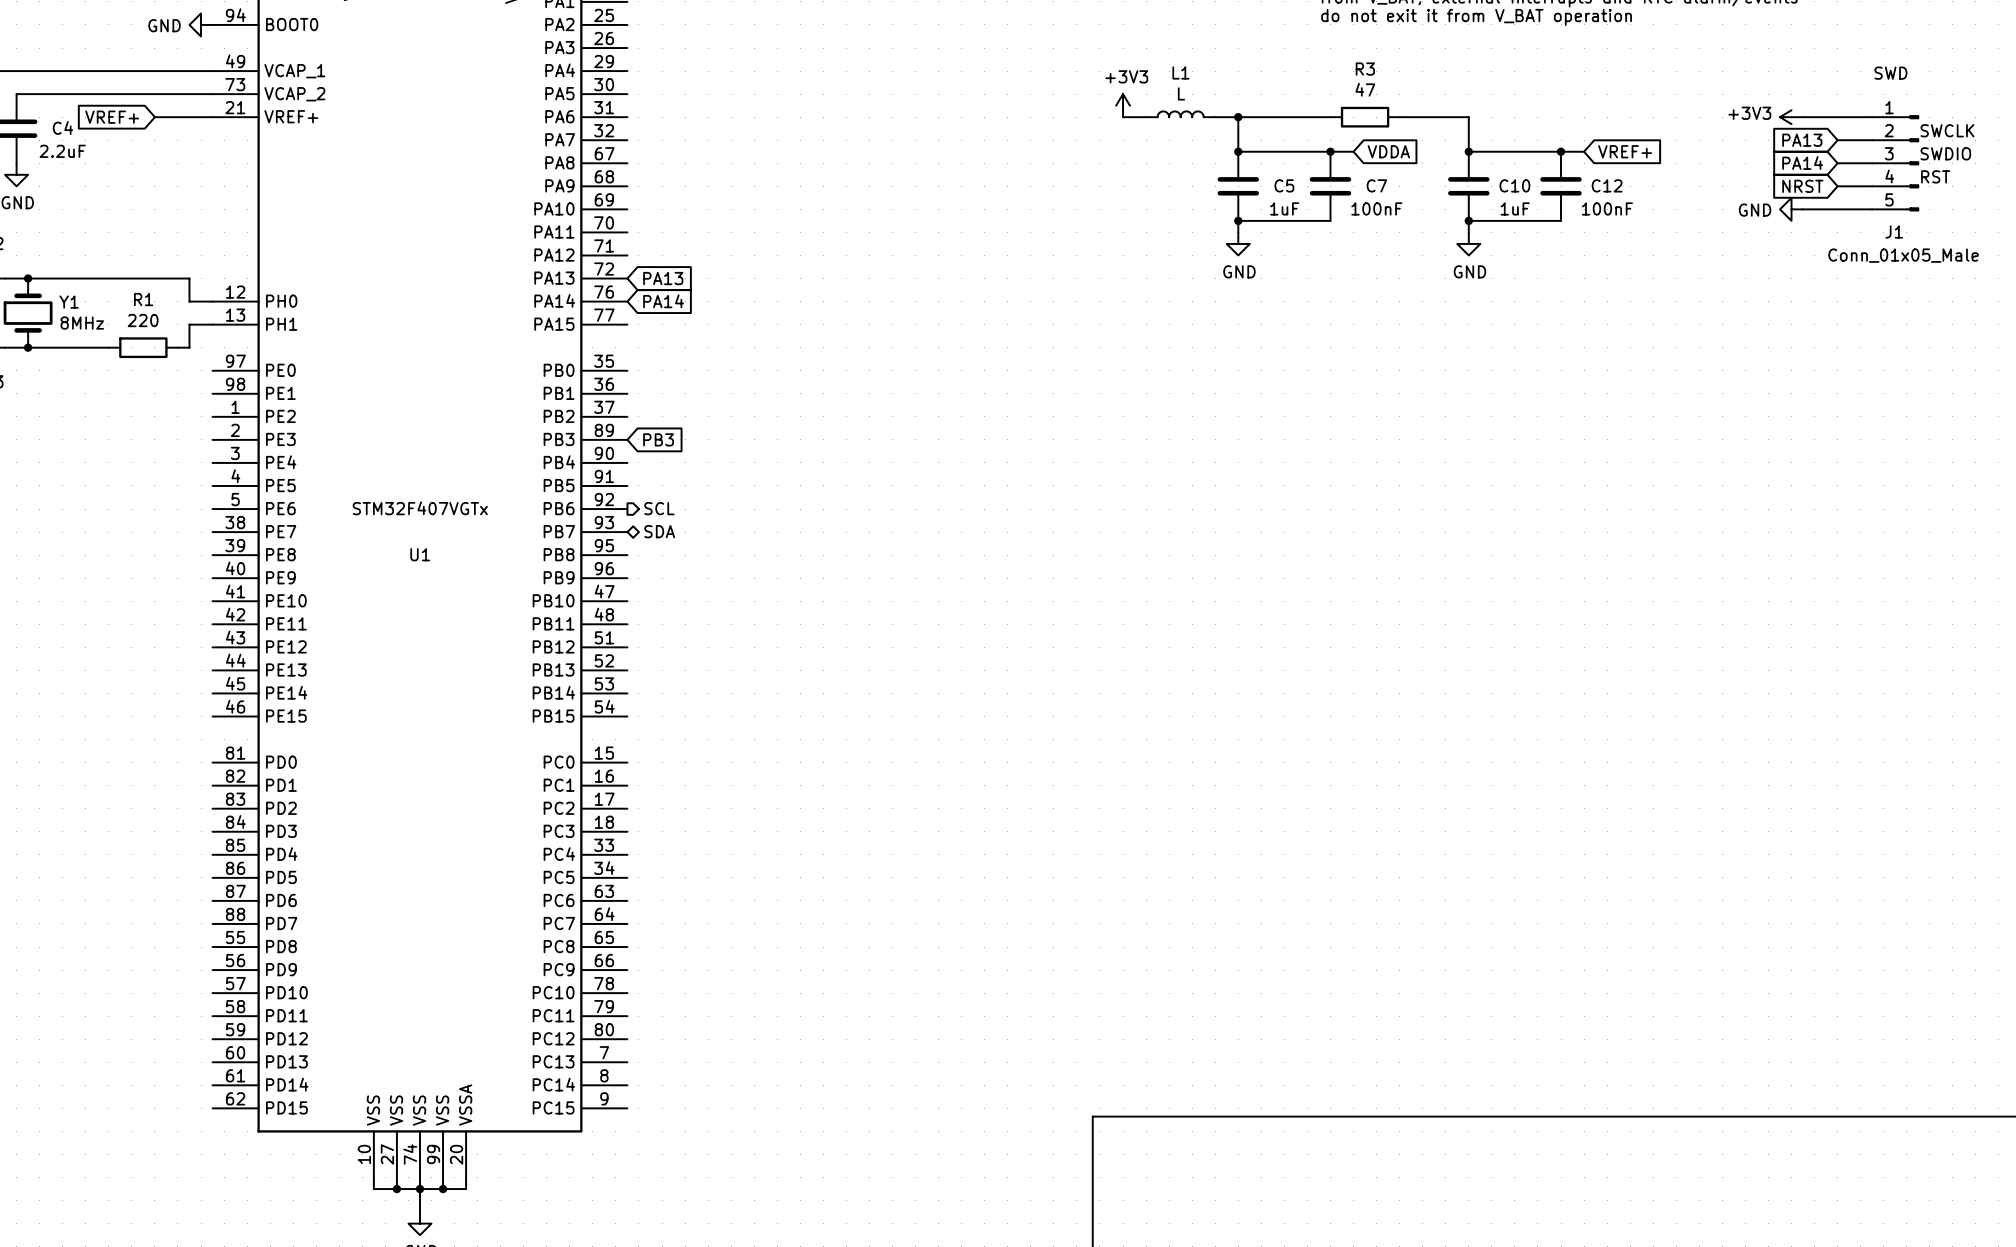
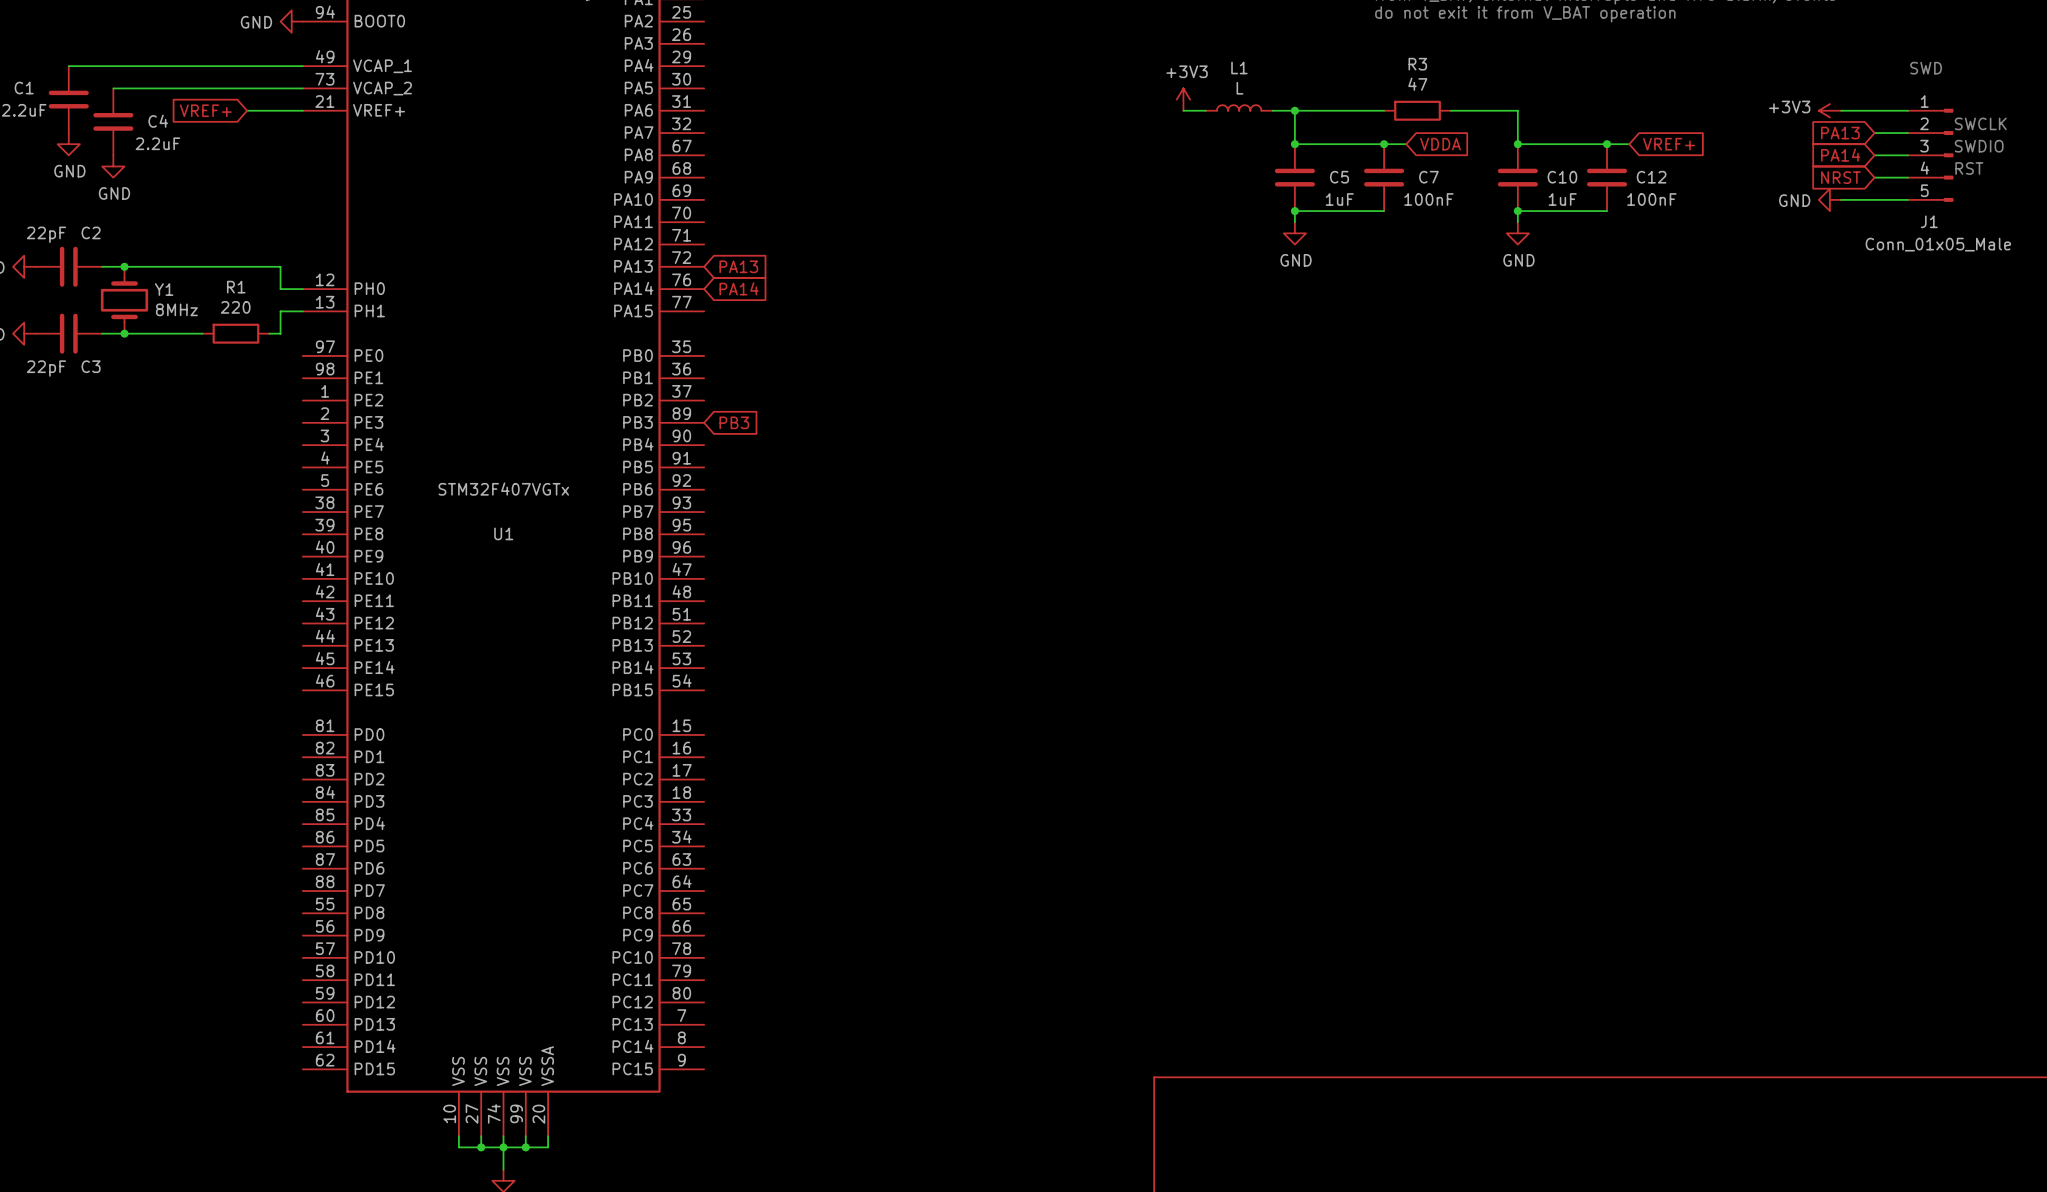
hierarchical label: SCL (659, 508) -> none
hierarchical label: SDA (659, 531) -> none

